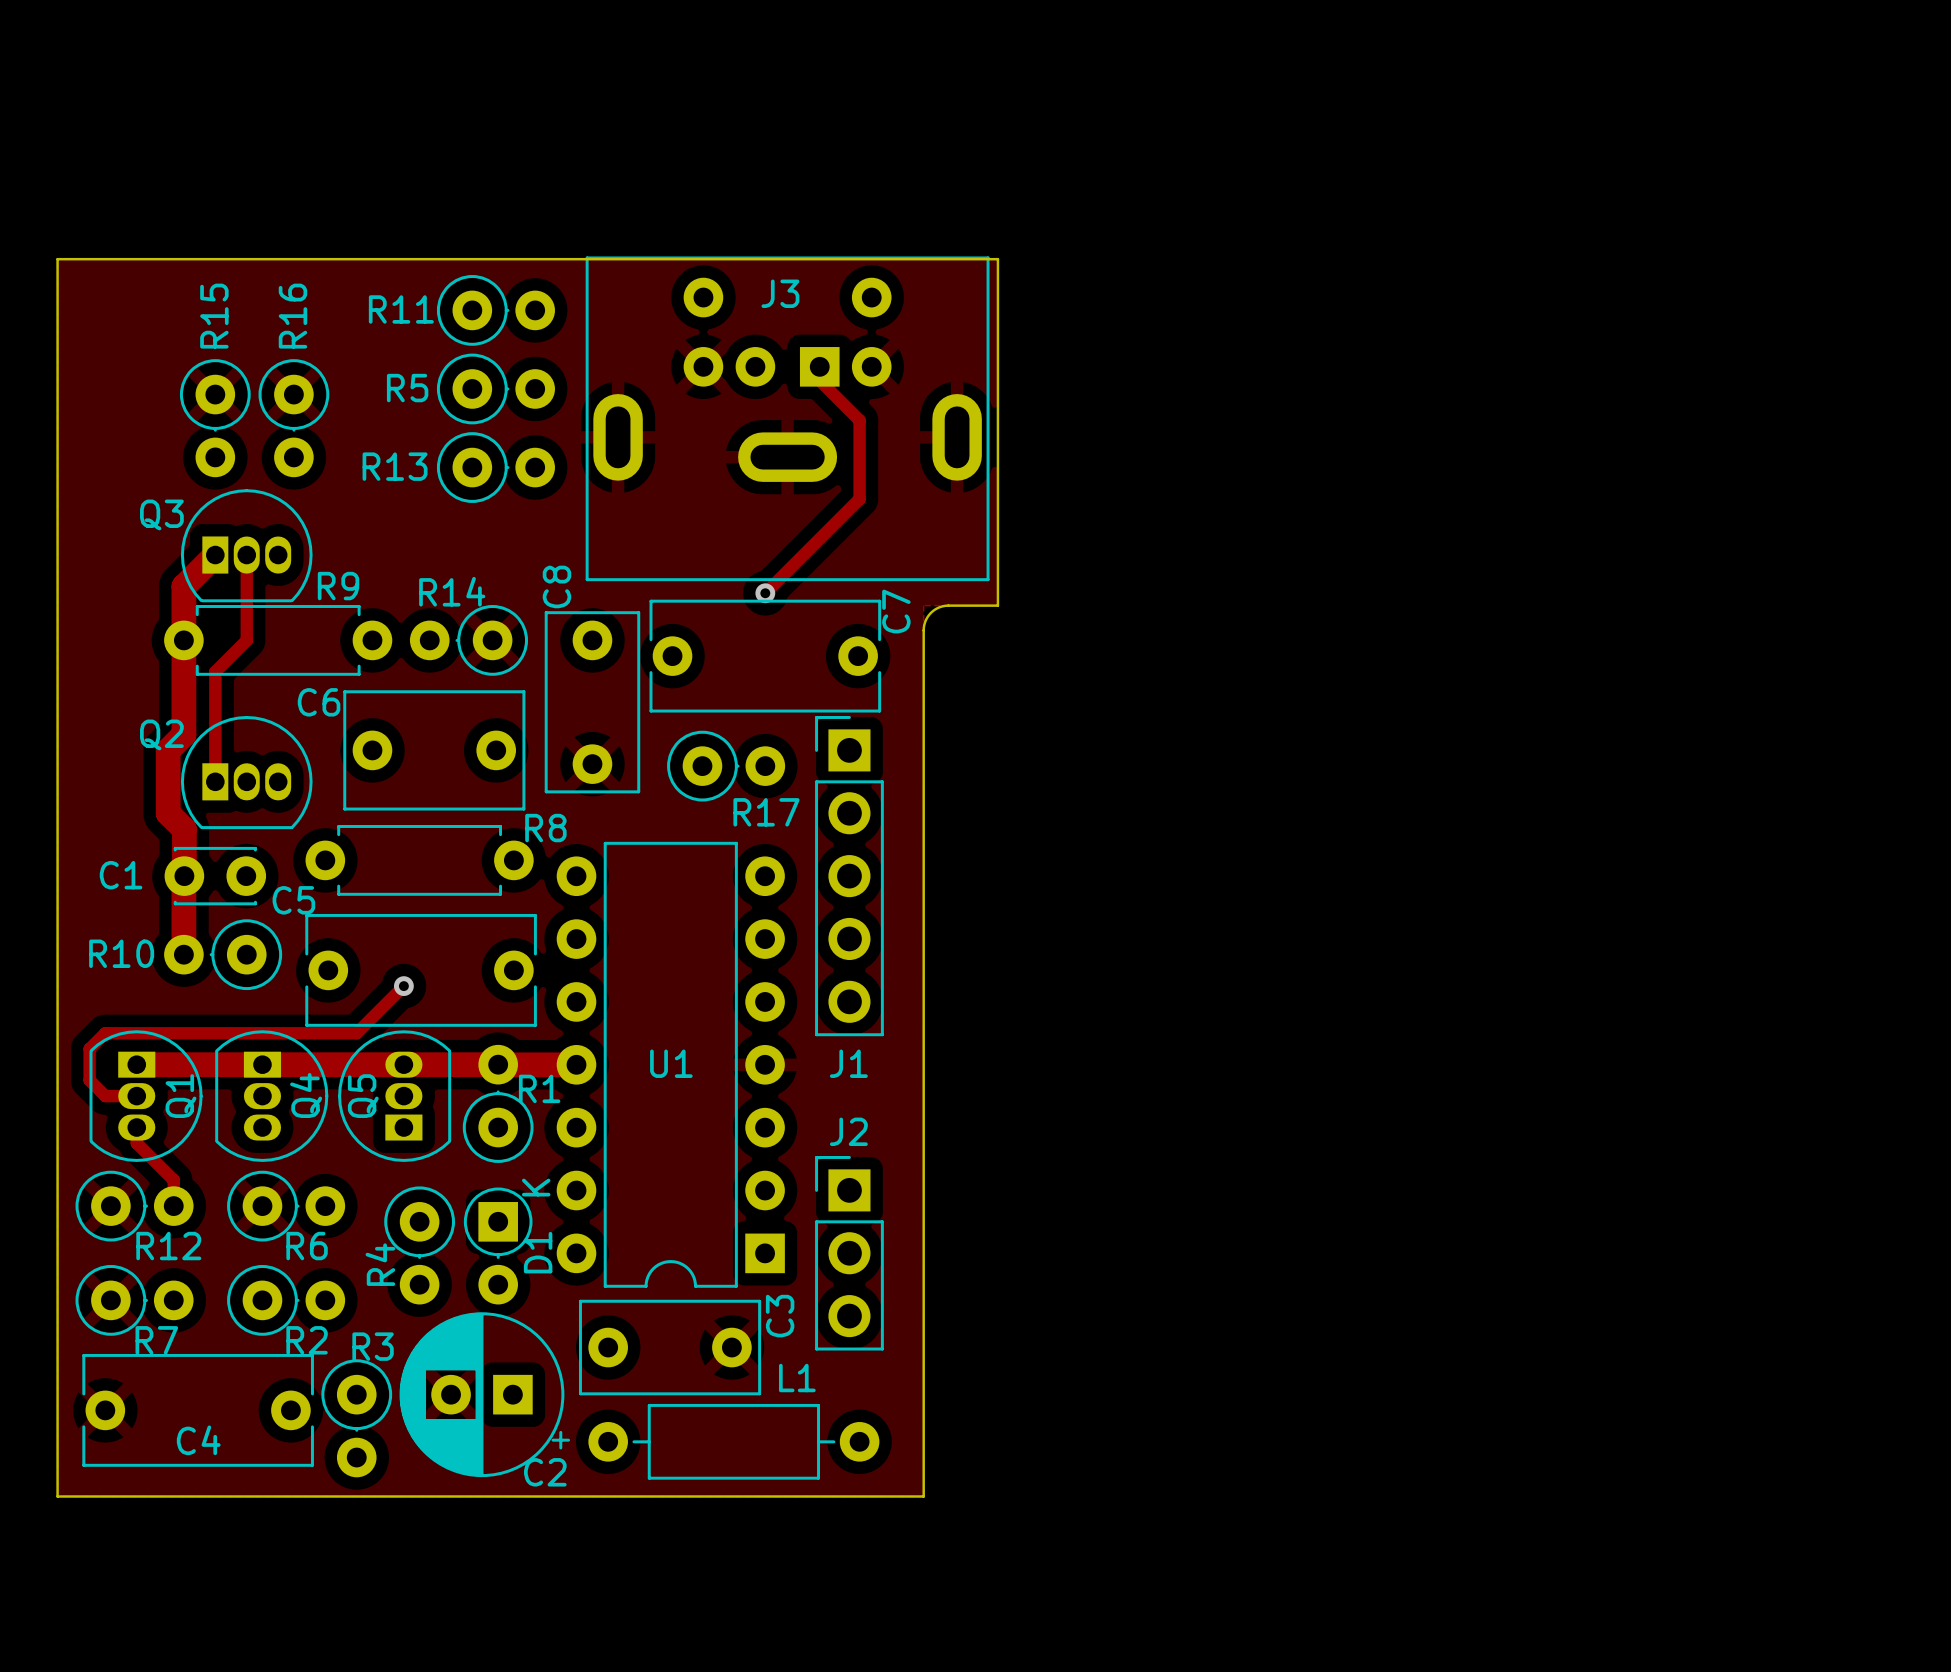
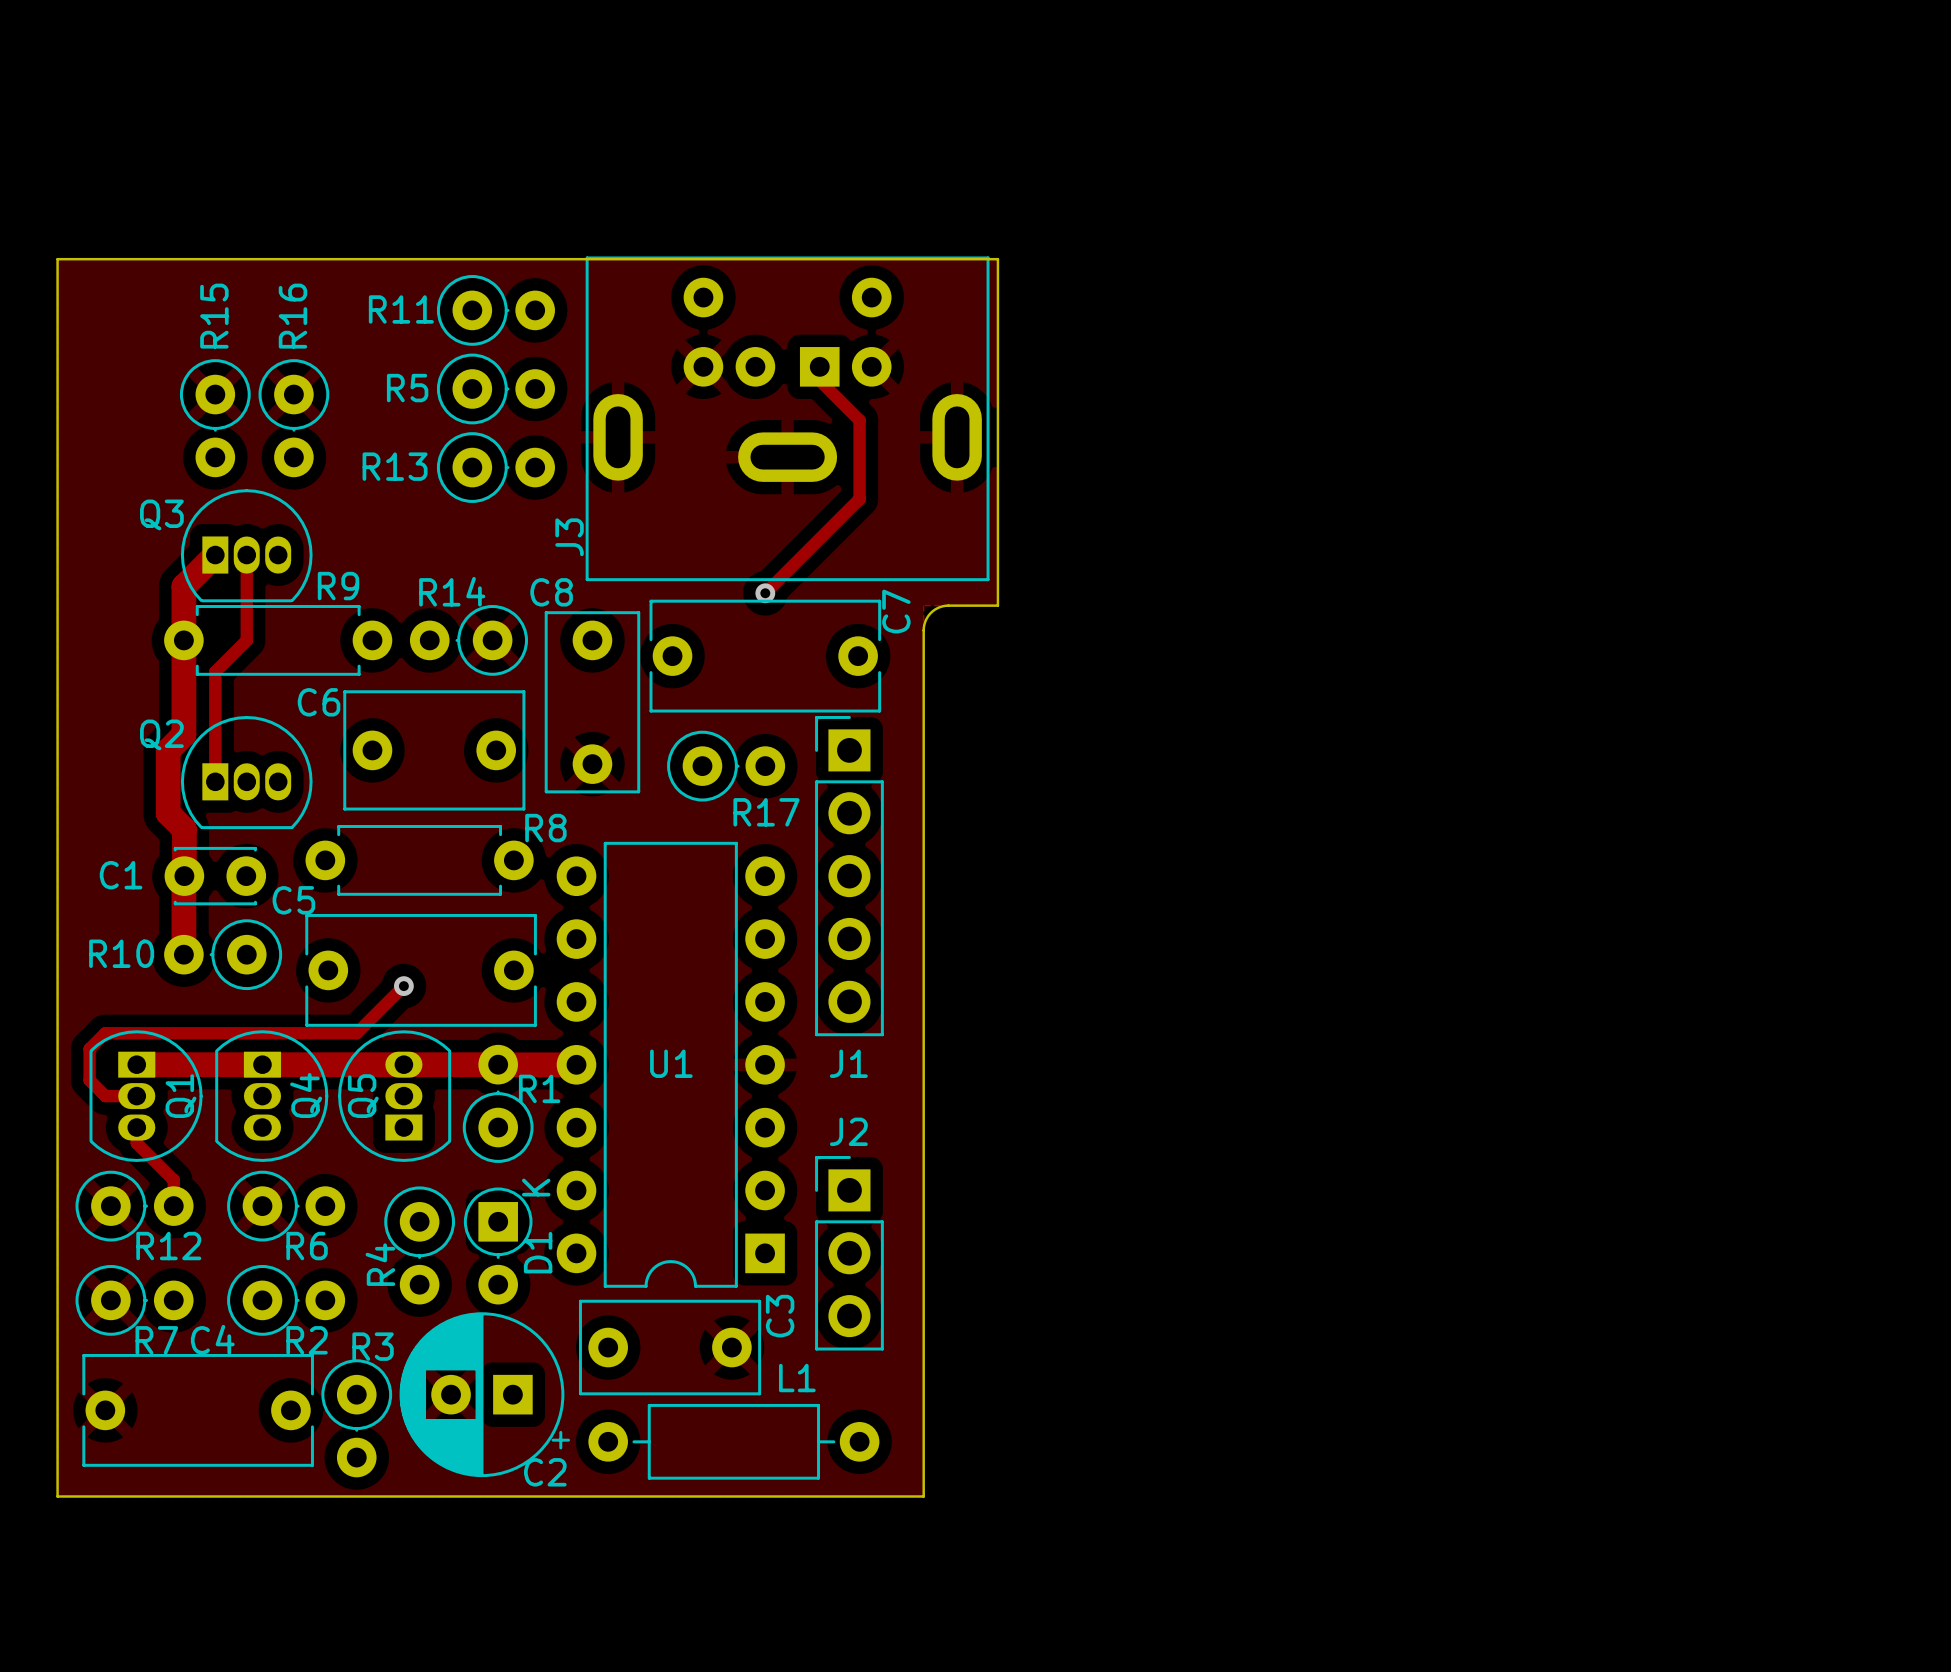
J3 name rotation: 0° (780, 293) -> 90° counterclockwise (569, 537)
J3 name position: J3 (780, 293) -> J3 (569, 537)
C8 name rotation: 0° (556, 586) -> 90° clockwise (551, 592)
C4 name position: C4 (198, 1440) -> C4 (212, 1339)

